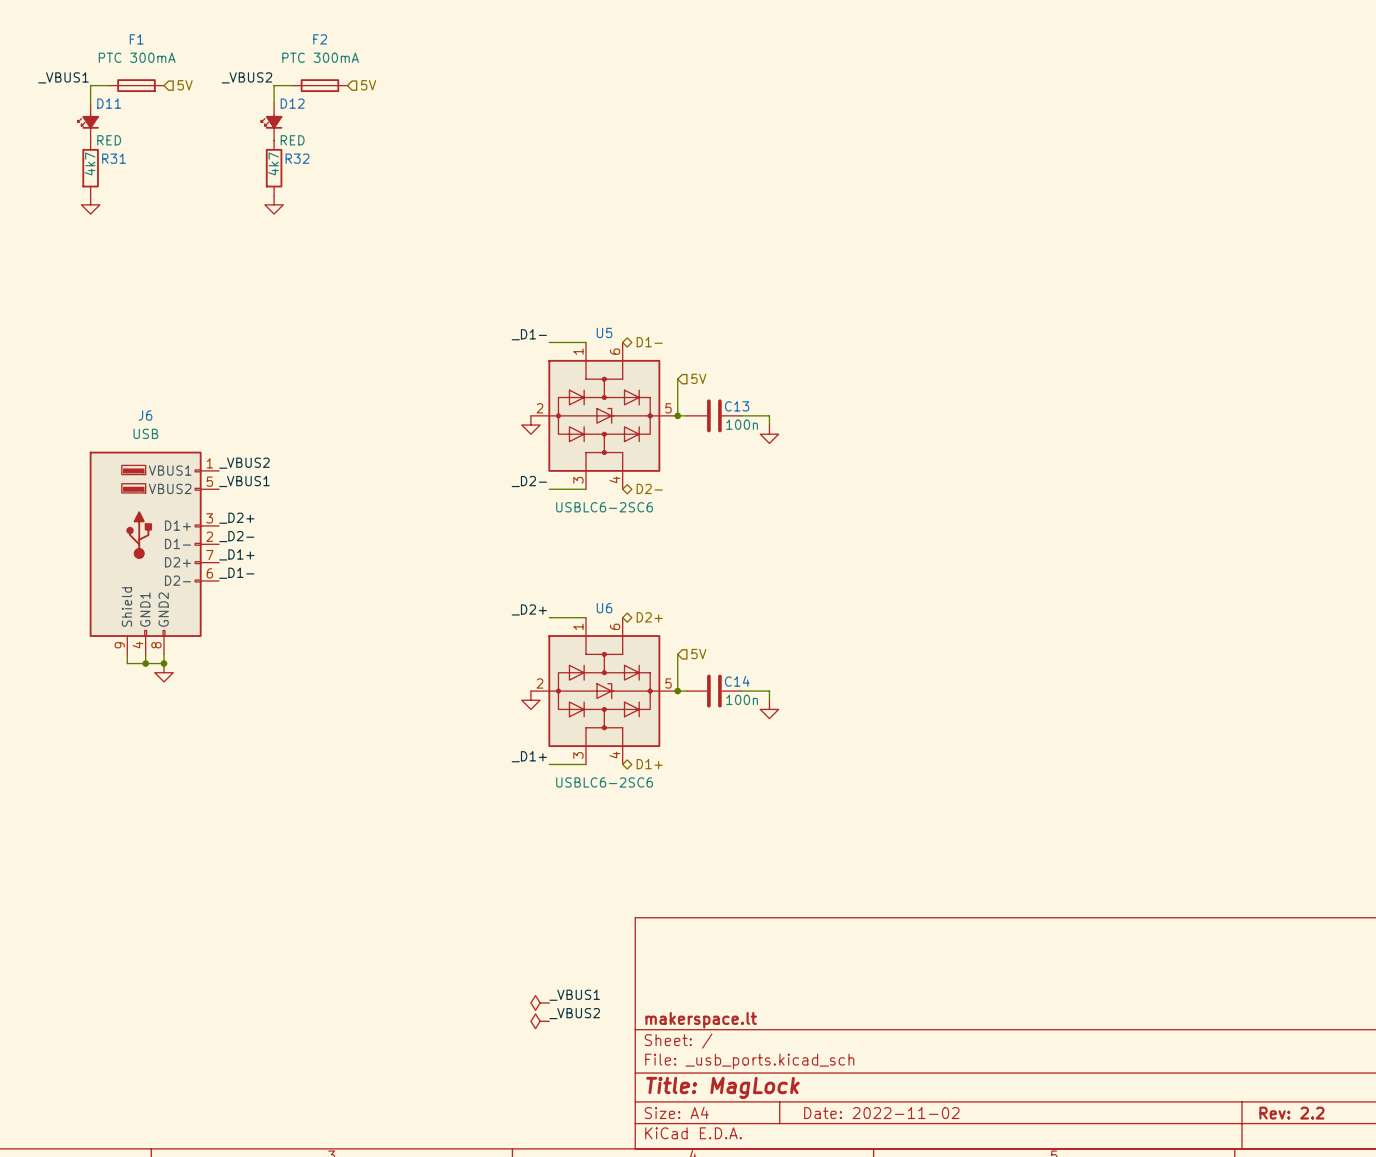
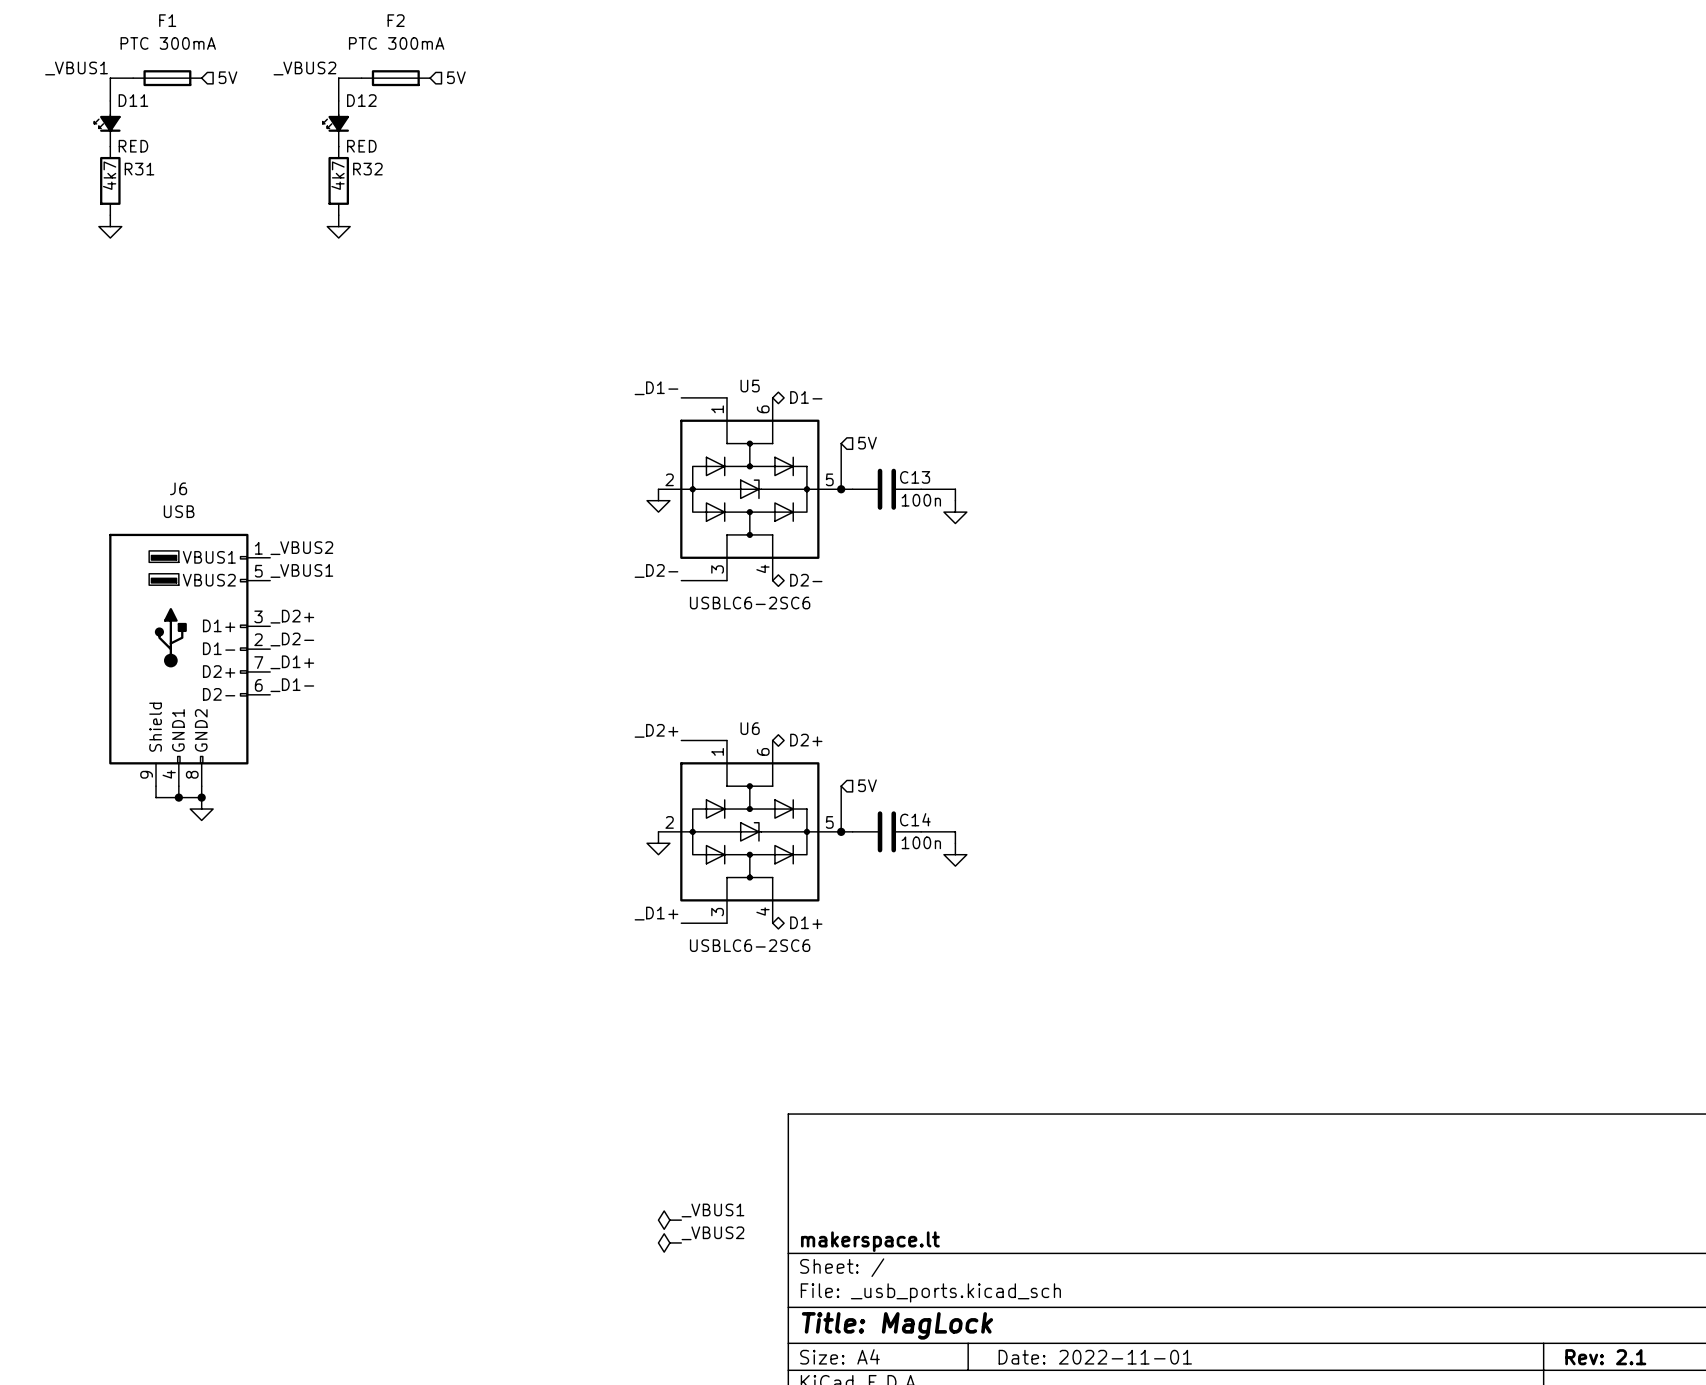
title block: Date: 2022-11-02 (881, 1113) -> Date: 2022-11-01 (1095, 1357)
title block: Rev: 2.2 (1291, 1113) -> Rev: 2.1 (1605, 1357)

